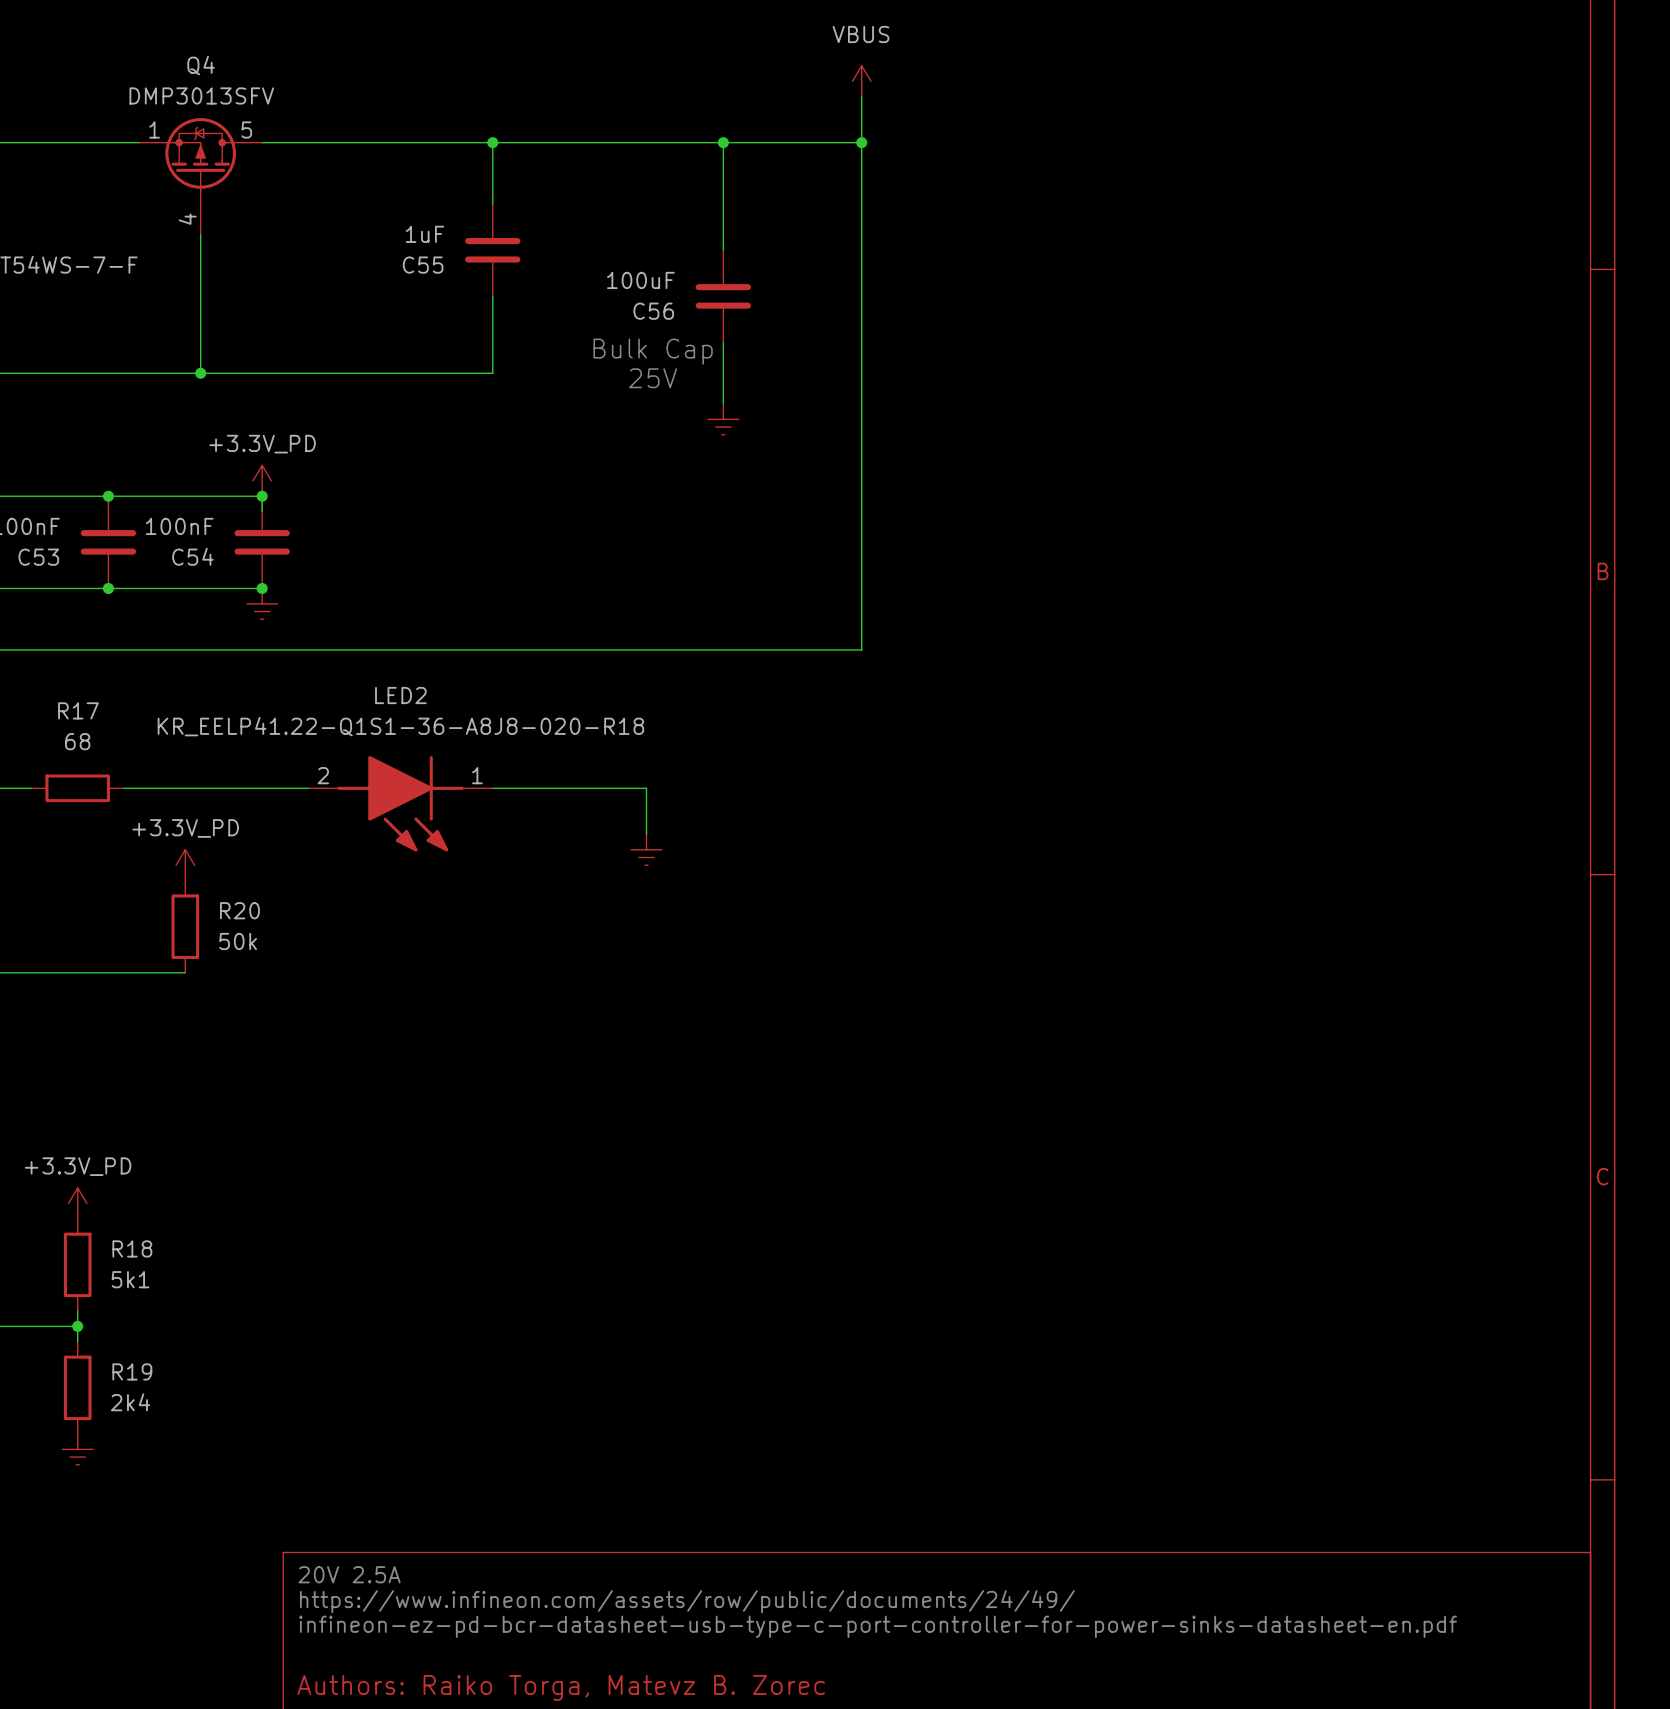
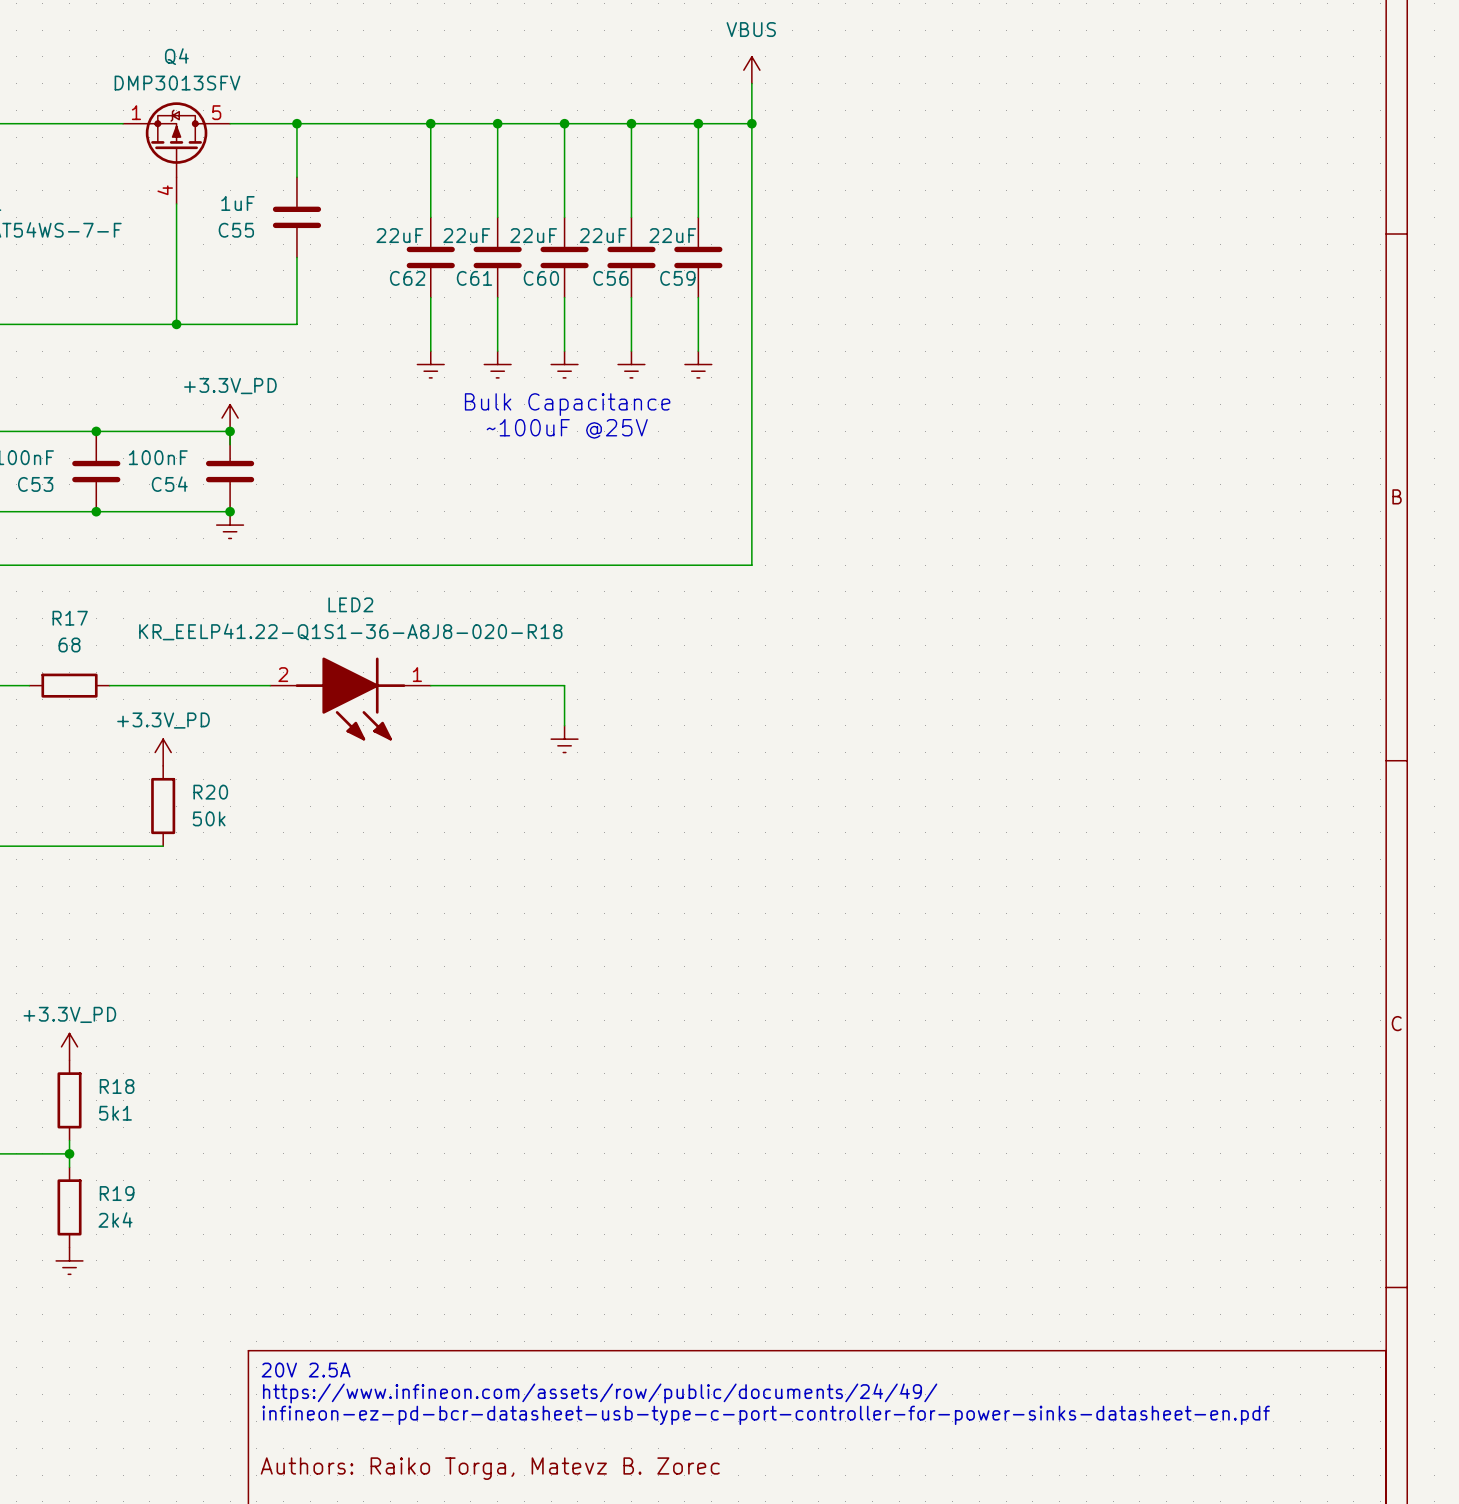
wire: none -> (296, 123) (296, 177)
junction: none -> (296, 123)
wire: none -> (497, 123) (497, 217)
junction: none -> (497, 123)
wire: none -> (564, 123) (564, 217)
junction: none -> (564, 123)
wire: none -> (698, 123) (698, 217)
junction: none -> (698, 123)
C55 position: (492, 250) -> (296, 217)
C56 value: 100uF (640, 280) -> 22uF (603, 235)
wire: none -> (296, 257) (296, 324)
C62: none -> 22uF (430, 257)
C61: none -> 22uF (497, 257)
C60: none -> 22uF (564, 257)
C59: none -> 22uF (698, 257)
C56 name position: C56 (653, 311) -> C56 (610, 278)
wire: none -> (497, 297) (497, 351)
wire: none -> (564, 297) (564, 351)
wire: none -> (698, 297) (698, 351)
text: Bulk Cap (653, 351) -> none
wire: (339, 373) (492, 373) -> (430, 351) (430, 324)
text: 25V (653, 378) -> none
power symbol: none -> (430, 364)
power symbol: none -> (497, 364)
power symbol: none -> (564, 364)
power symbol: none -> (698, 364)
text: none -> Bulk Capacitance (567, 404)
text: none -> ~100uF @25V (567, 428)

